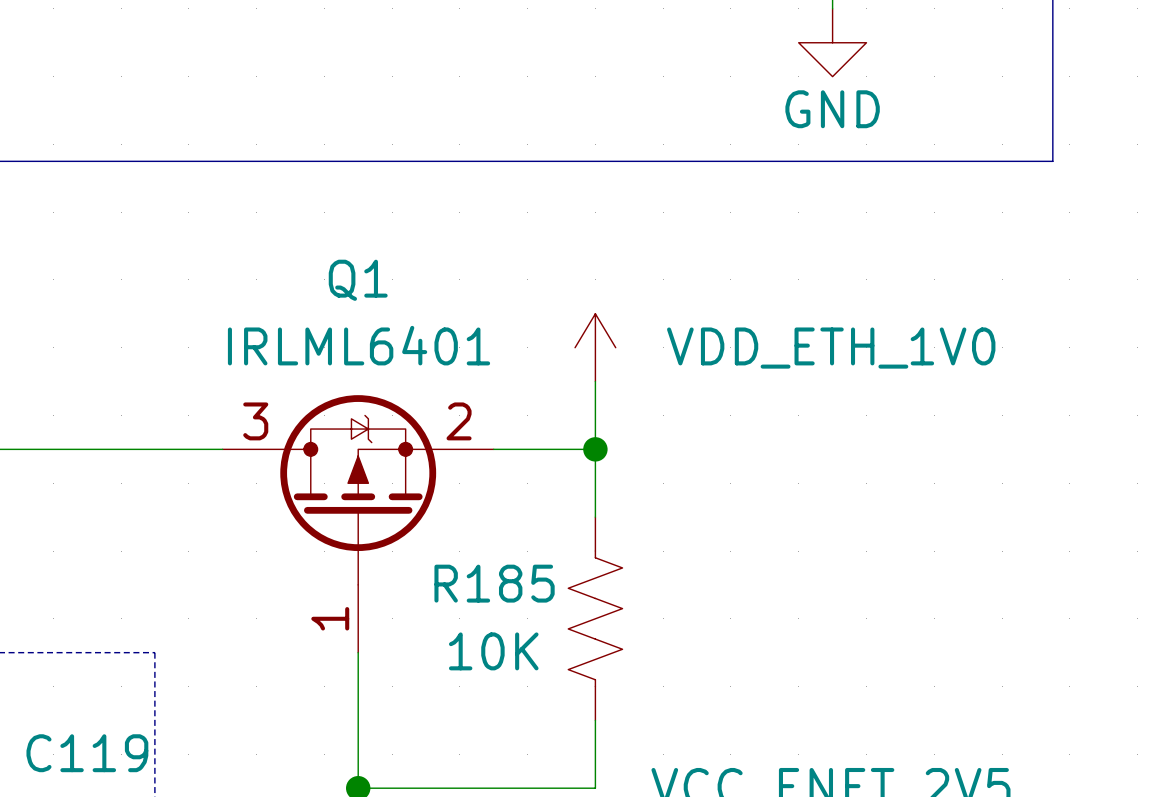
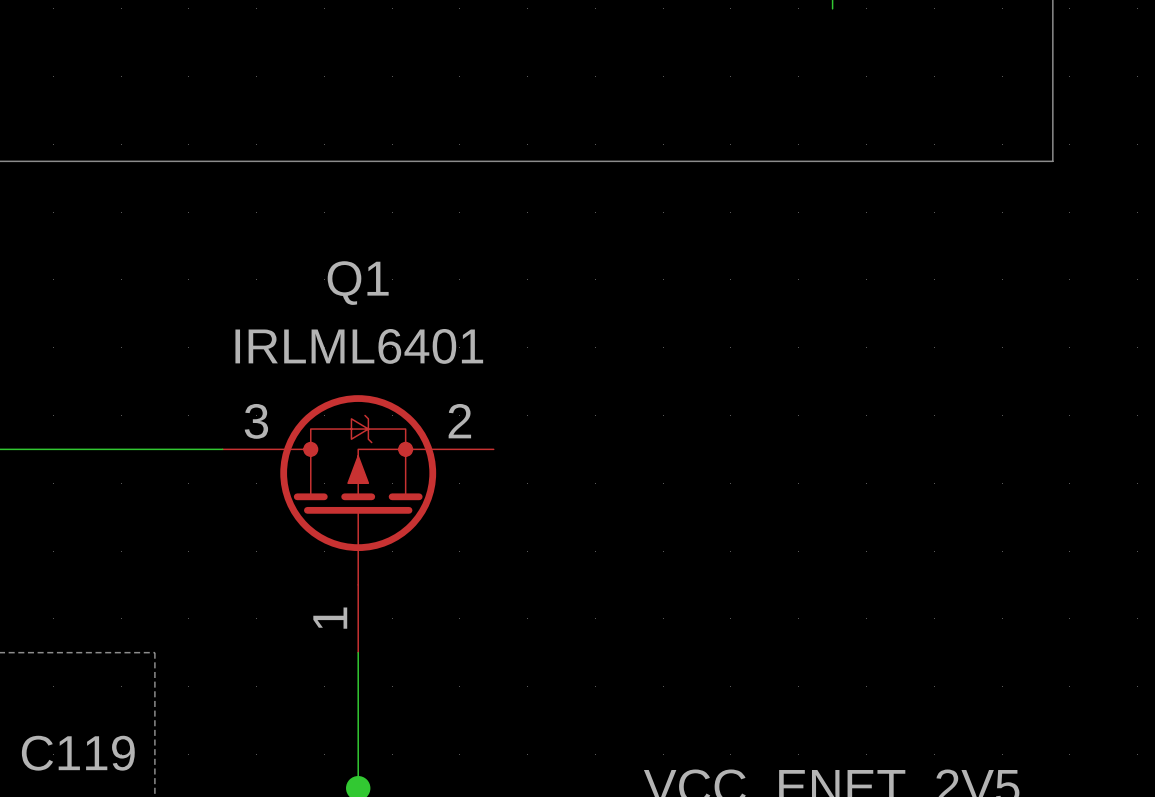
power symbol: GND (832, 42) -> none
power symbol: VDD_ETH_1V0 (595, 347) -> none
wire: (595, 381) (595, 517) -> none
wire: (493, 449) (595, 449) -> none
junction: (595, 449) -> none
R185: 10K (595, 618) -> none
wire: (595, 720) (595, 788) (358, 788) -> none

